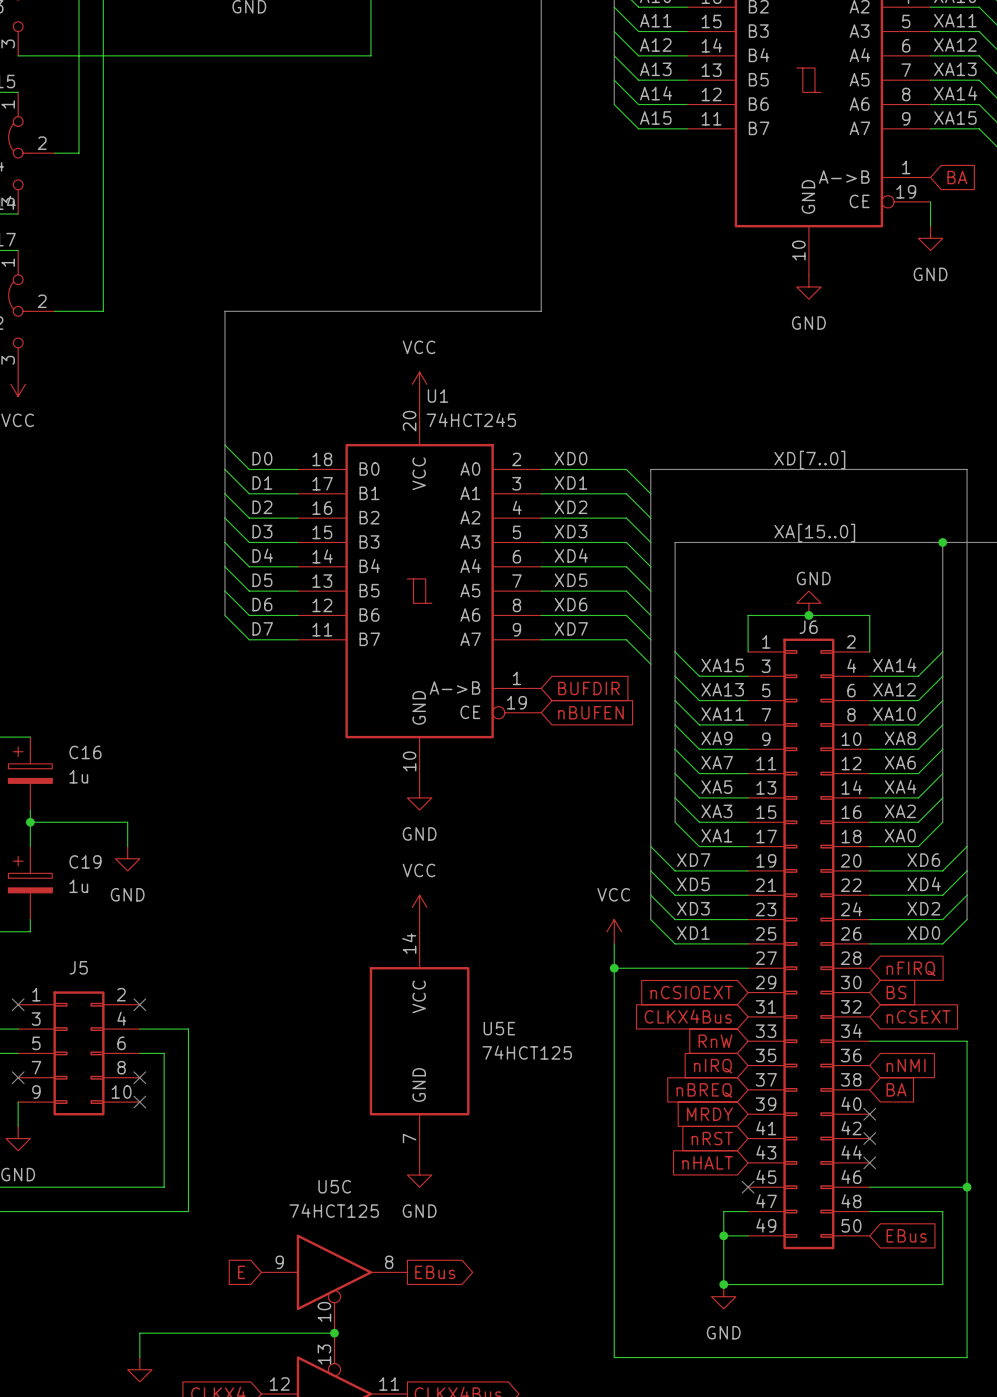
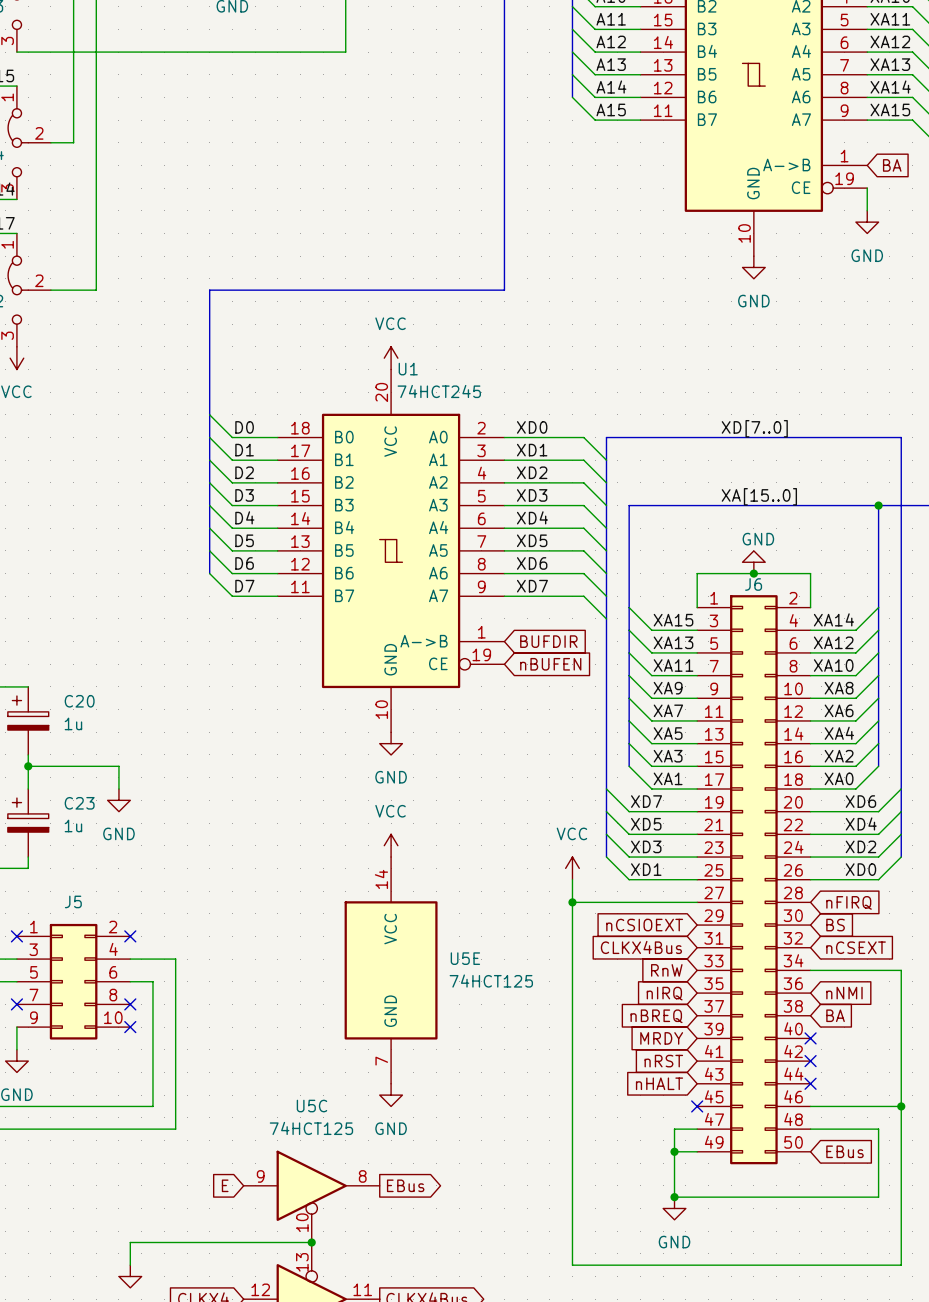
C16 name: C16 (85, 752) -> C20 (79, 701)
C19 name: C19 (85, 861) -> C23 (79, 803)

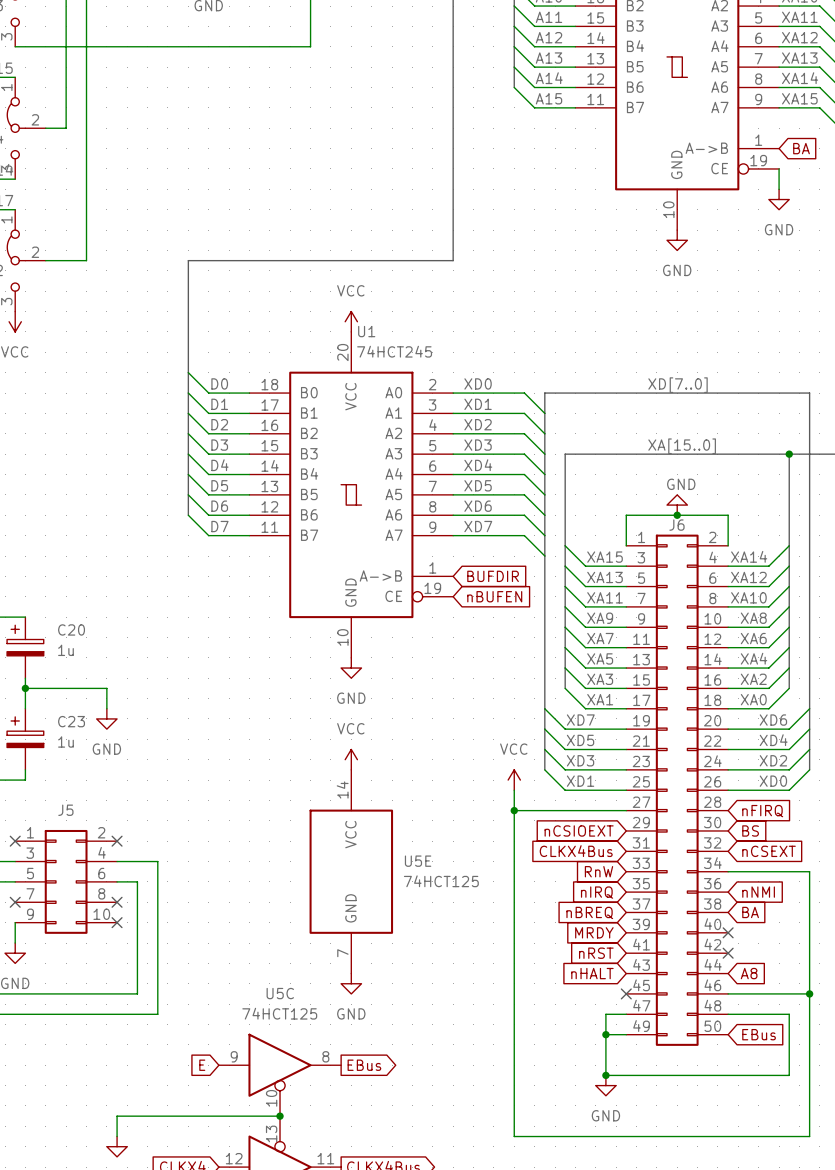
no-connect mark: (810, 1083) -> none
global label: none -> A8 (749, 973)

